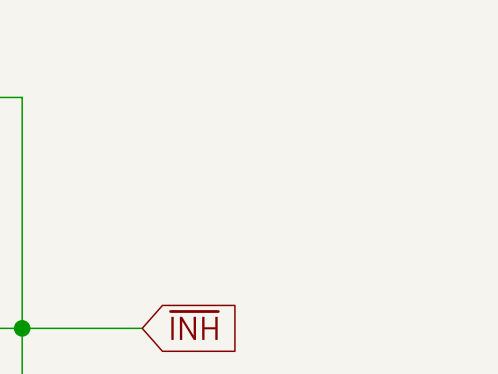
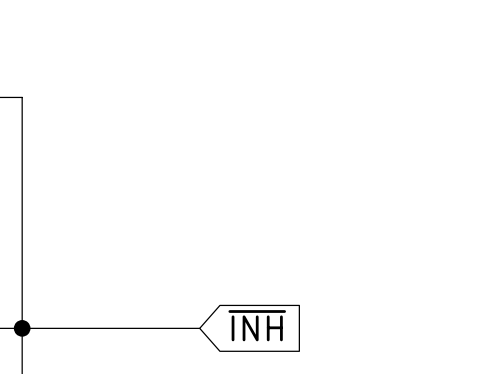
global label position: ~{INH} (194, 325) -> ~{INH} (257, 325)
wire: none -> (142, 328) (199, 328)

